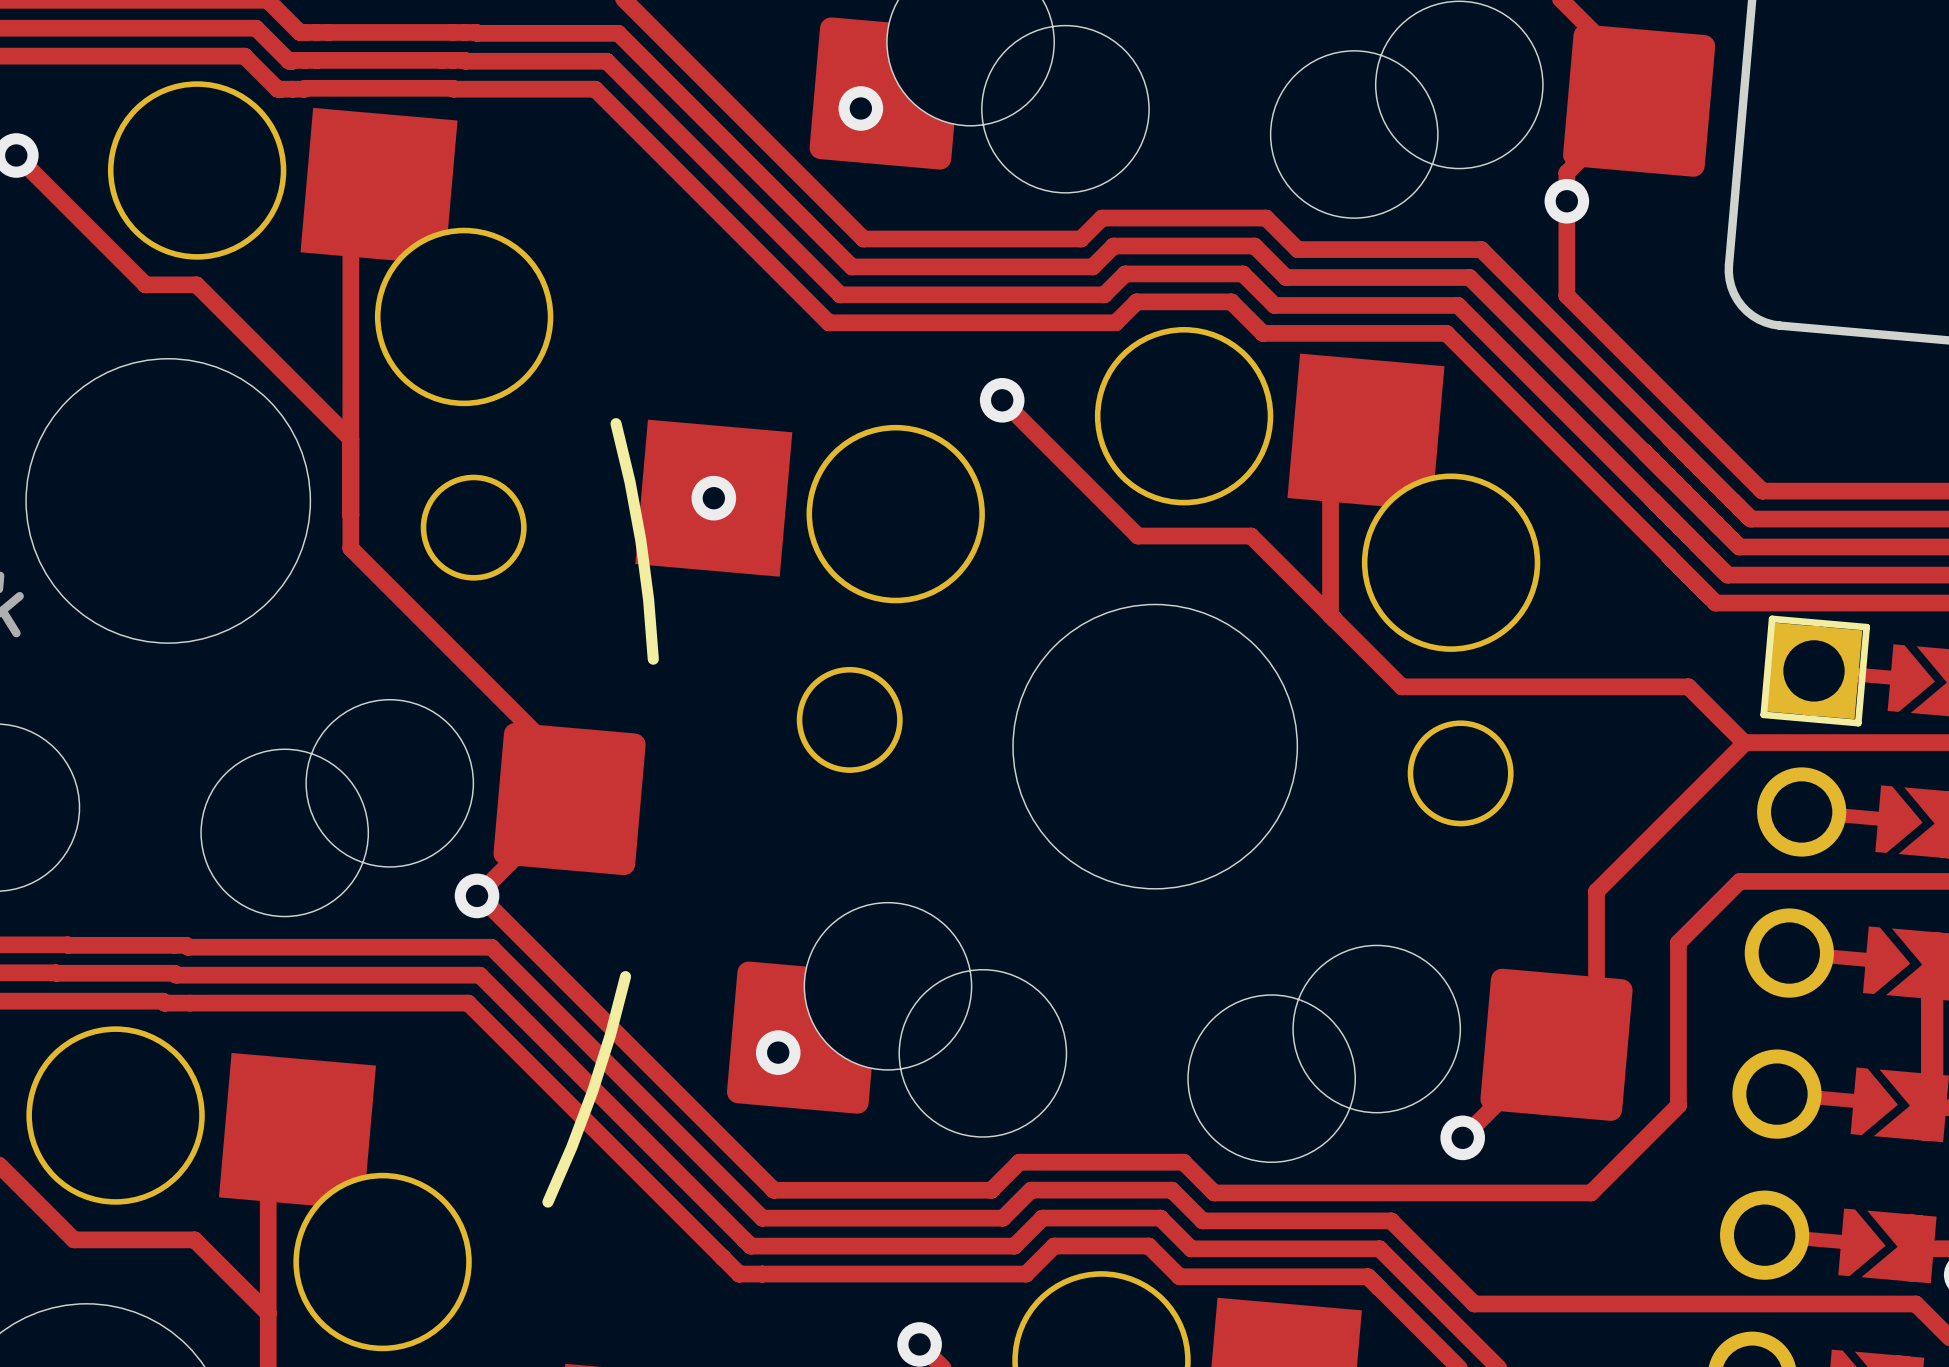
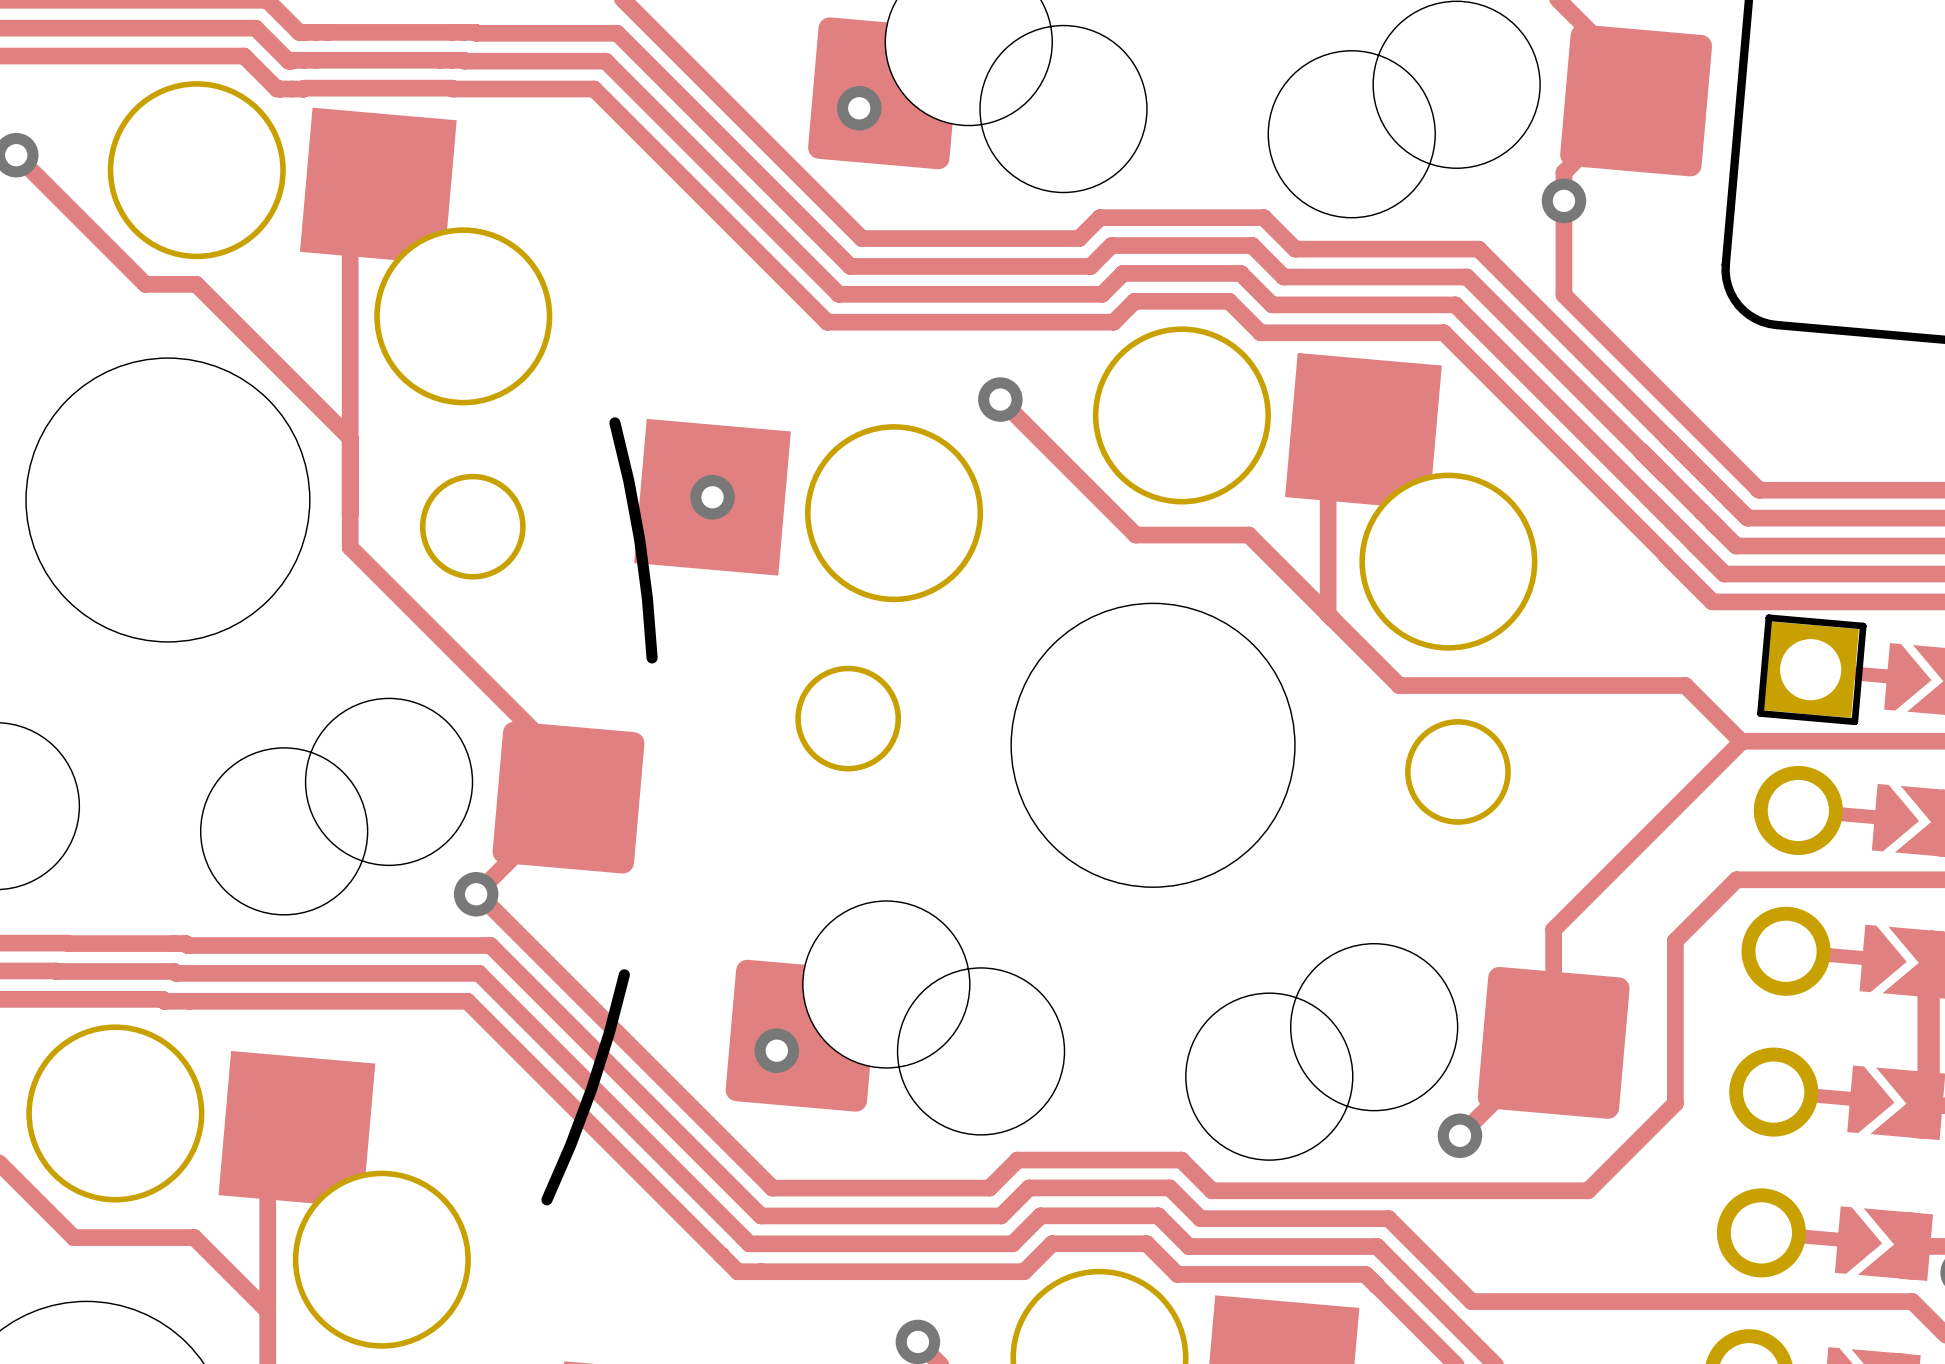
track: (1596, 891) (1596, 1004) (1556, 1044) -> (1593, 889) (1553, 929) (1553, 1042)

